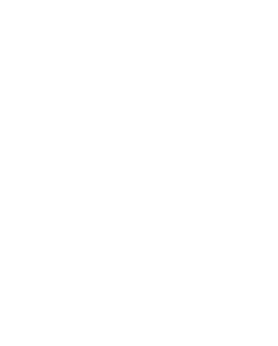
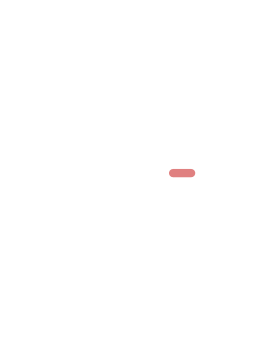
top track: none -> (173, 173) (191, 173)

